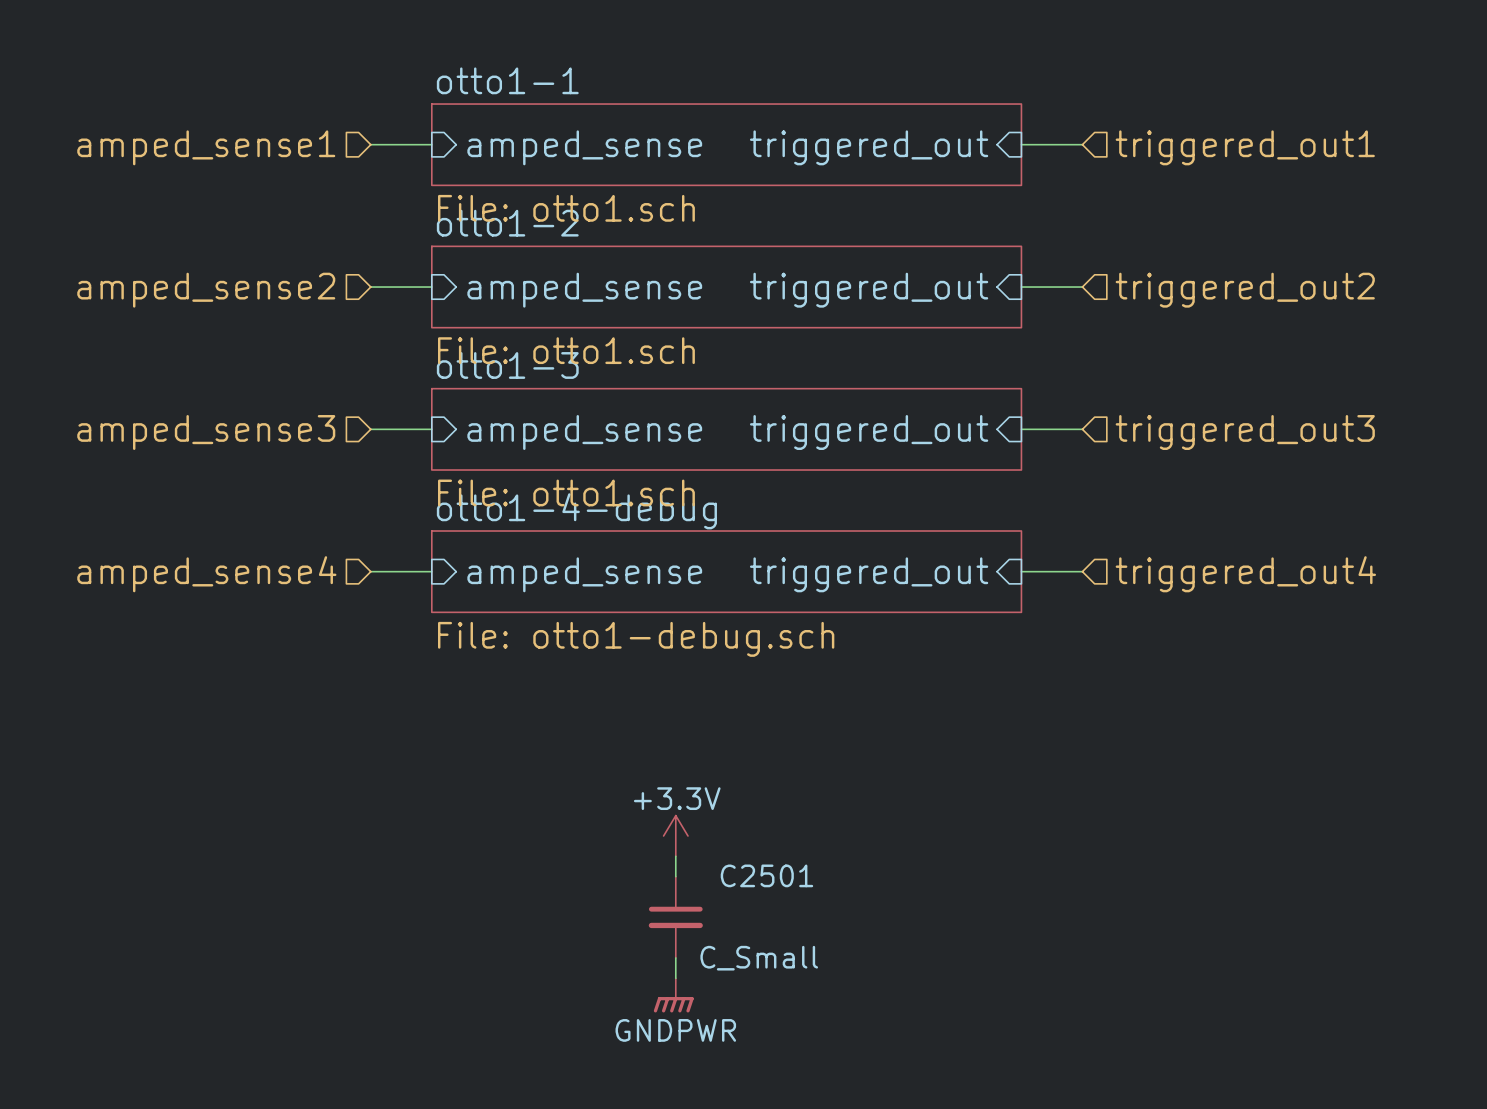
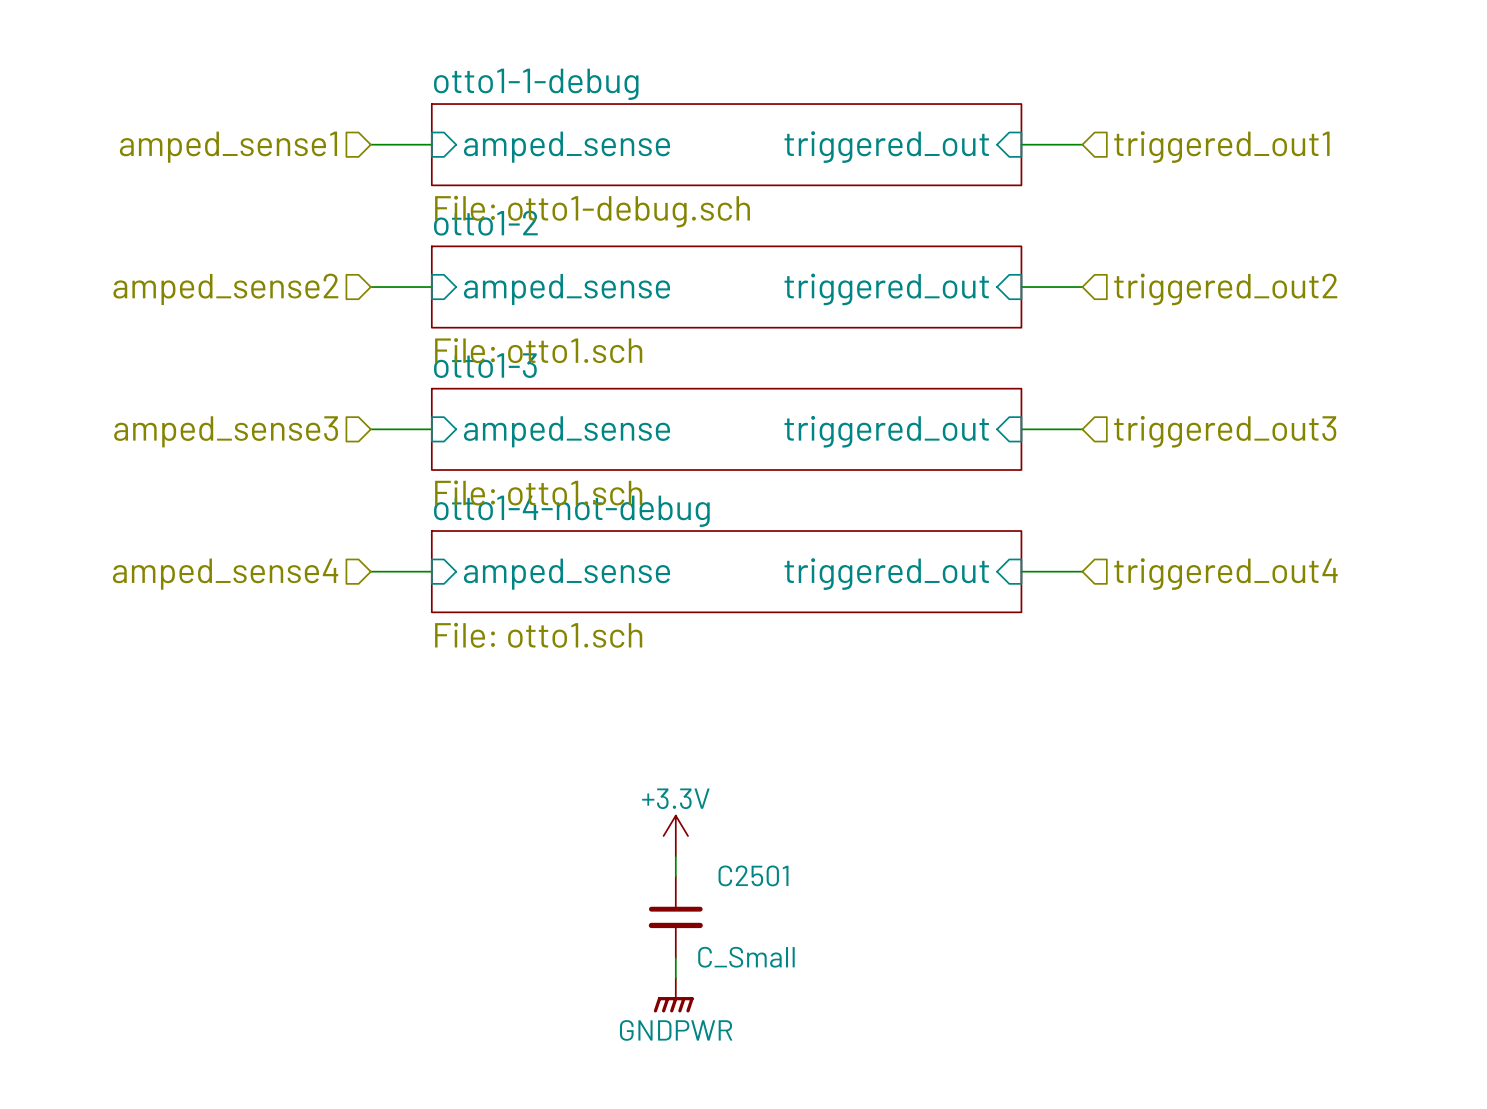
sheet otto1-1 name: otto1-1 (507, 80) -> otto1-1-debug (536, 84)
sheet otto1-1 value: File: otto1.sch (566, 208) -> File: otto1-debug.sch (592, 211)
sheet otto1-4-debug name: otto1-4-debug (576, 511) -> otto1-4-not-debug (571, 511)
sheet otto1-4-debug value: File: otto1-debug.sch (636, 639) -> File: otto1.sch (538, 635)

